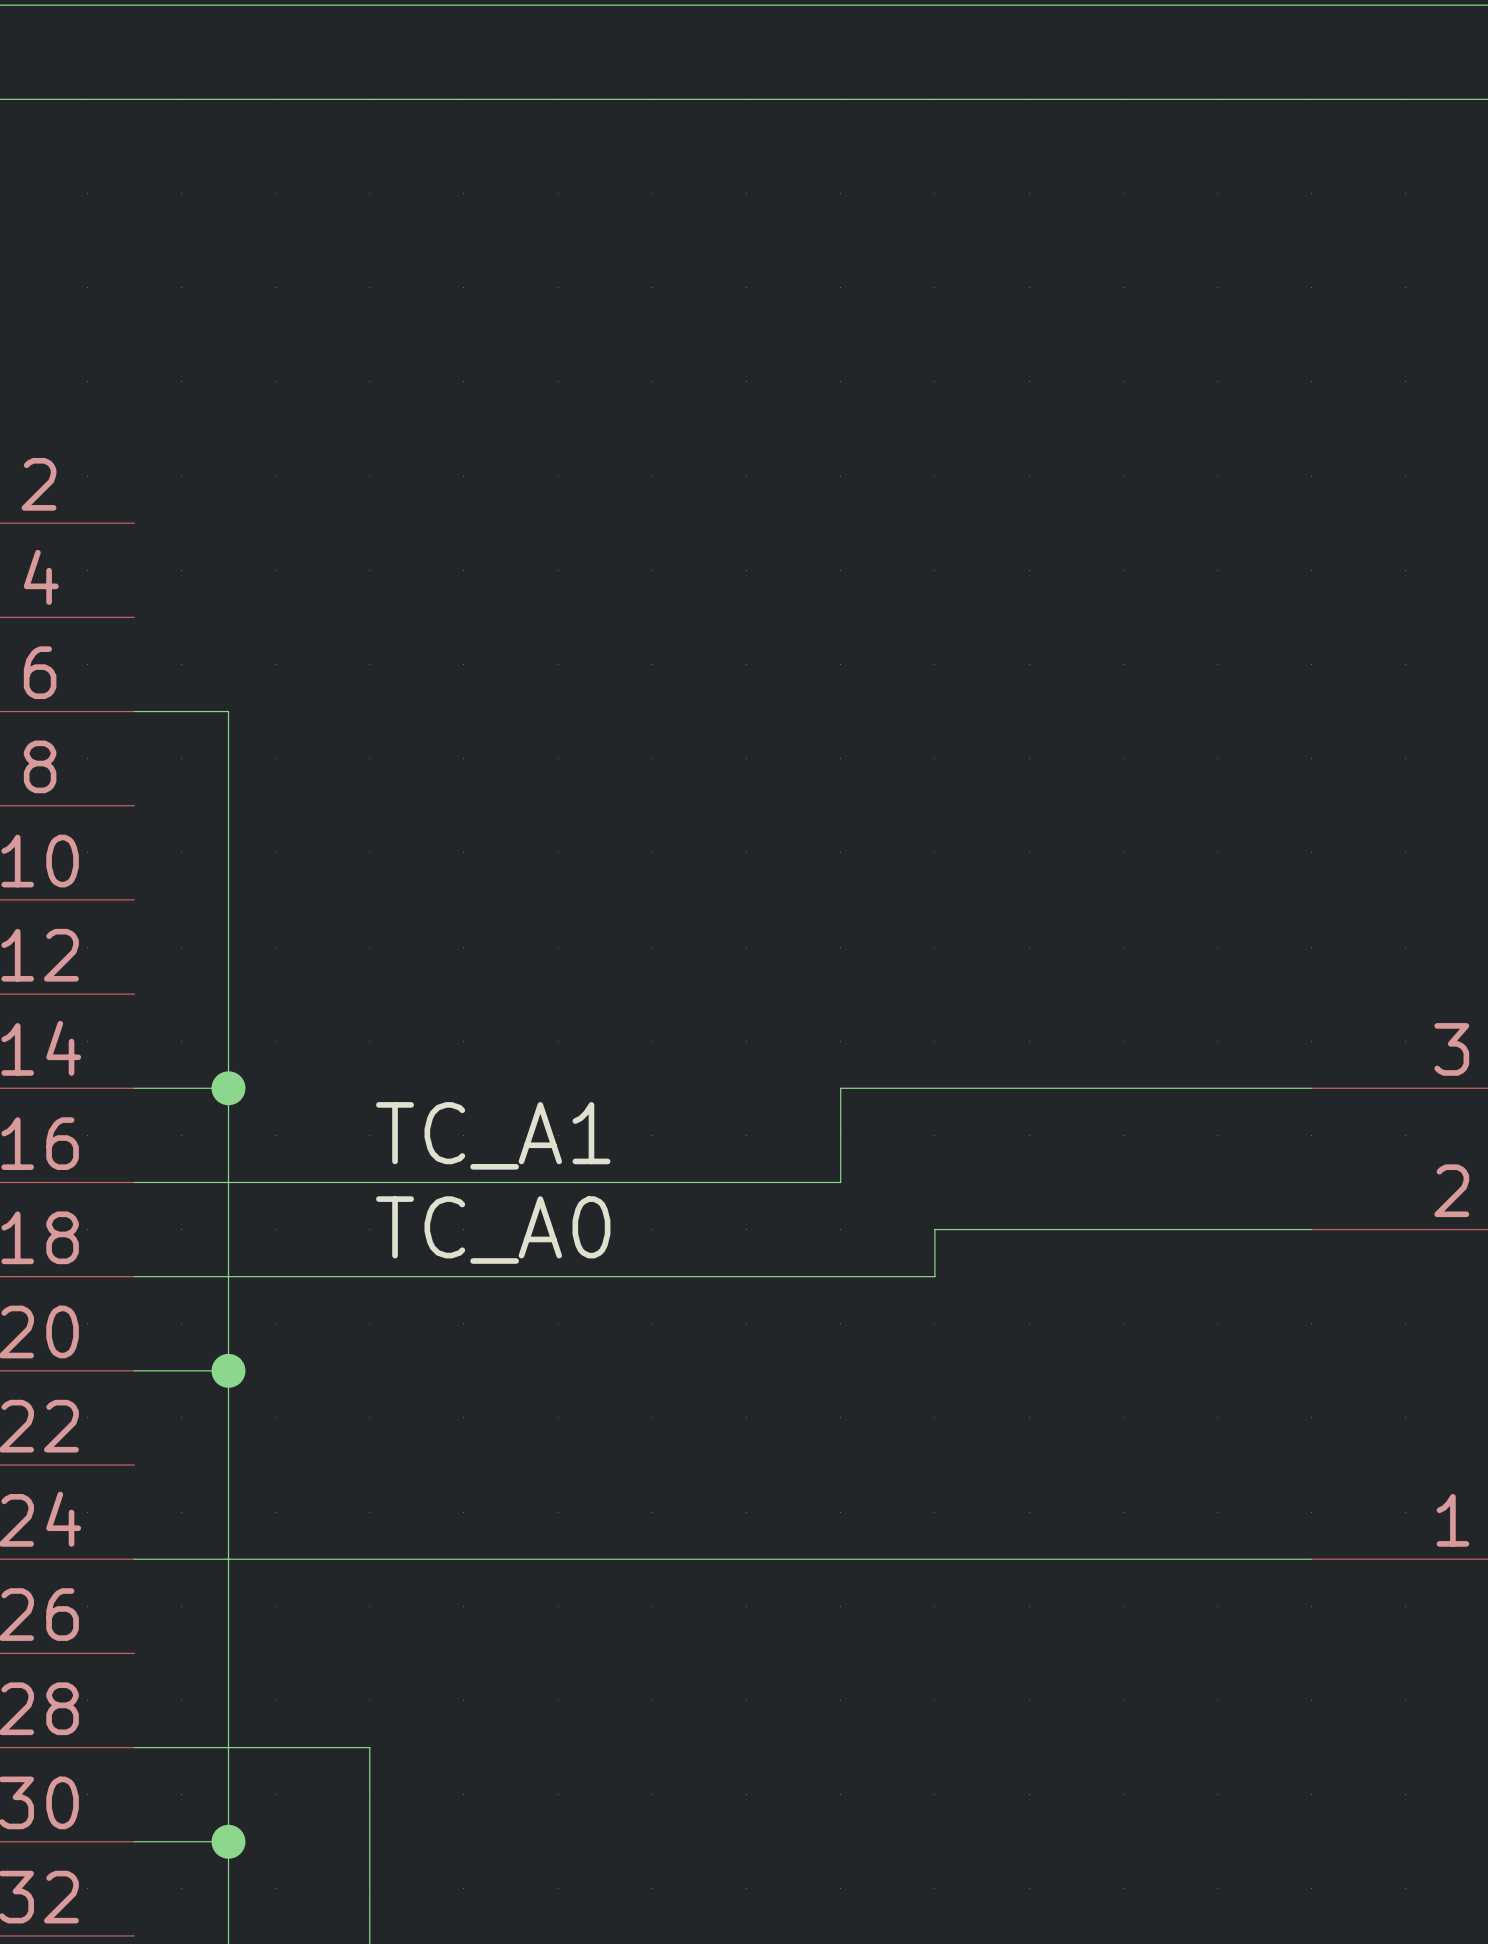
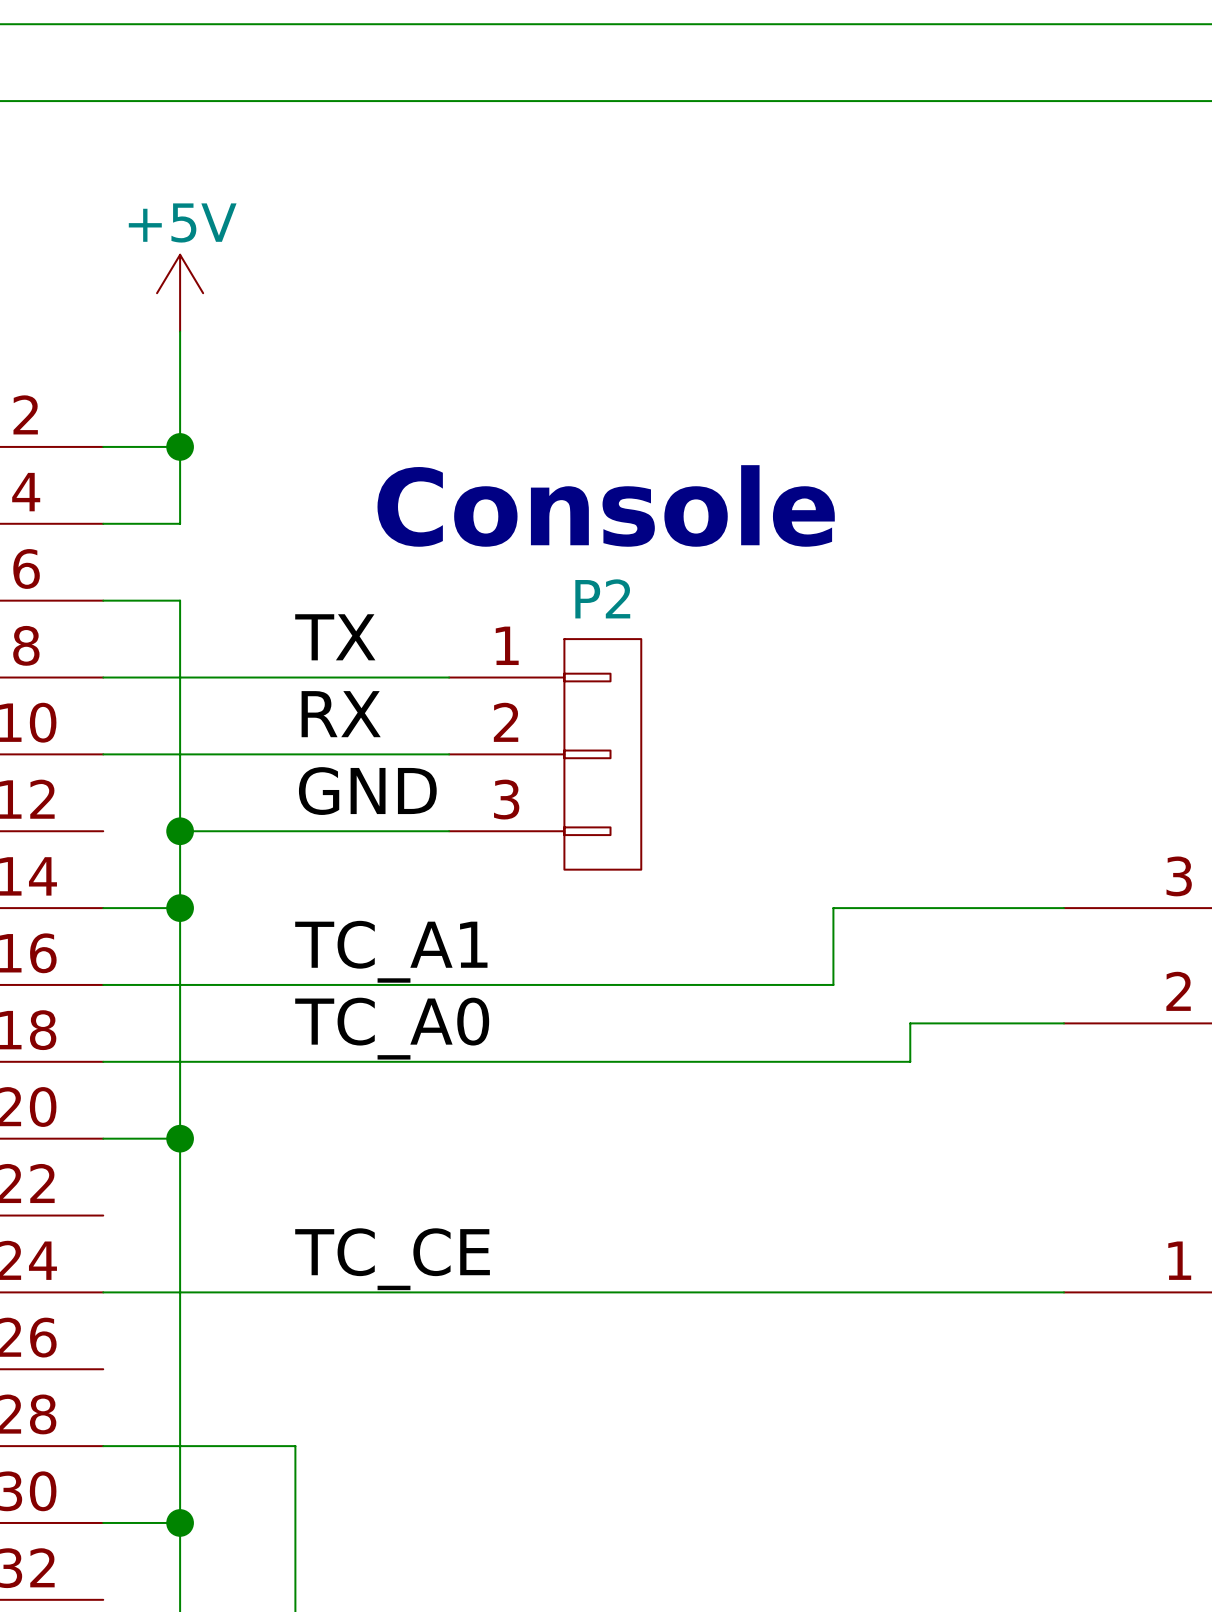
power symbol: none -> +5V (180, 293)
wire: none -> (180, 331) (180, 523) (103, 523)
wire: none -> (103, 446) (180, 446)
junction: none -> (180, 446)
text: none -> Console (606, 505)
label: none -> TX (335, 637)
wire: none -> (103, 677) (449, 677)
label: none -> RX (341, 714)
wire: none -> (103, 754) (449, 754)
P2: none -> (545, 754)
label: none -> GND (367, 791)
wire: none -> (180, 831) (449, 831)
junction: none -> (180, 831)
wire: (1029, 1088) (840, 1088) (840, 1182) -> (833, 908) (833, 984) (679, 984)
wire: (1123, 1229) (934, 1229) (934, 1276) -> (910, 1023) (910, 1061) (756, 1061)
label: none -> TC_CE (392, 1259)

